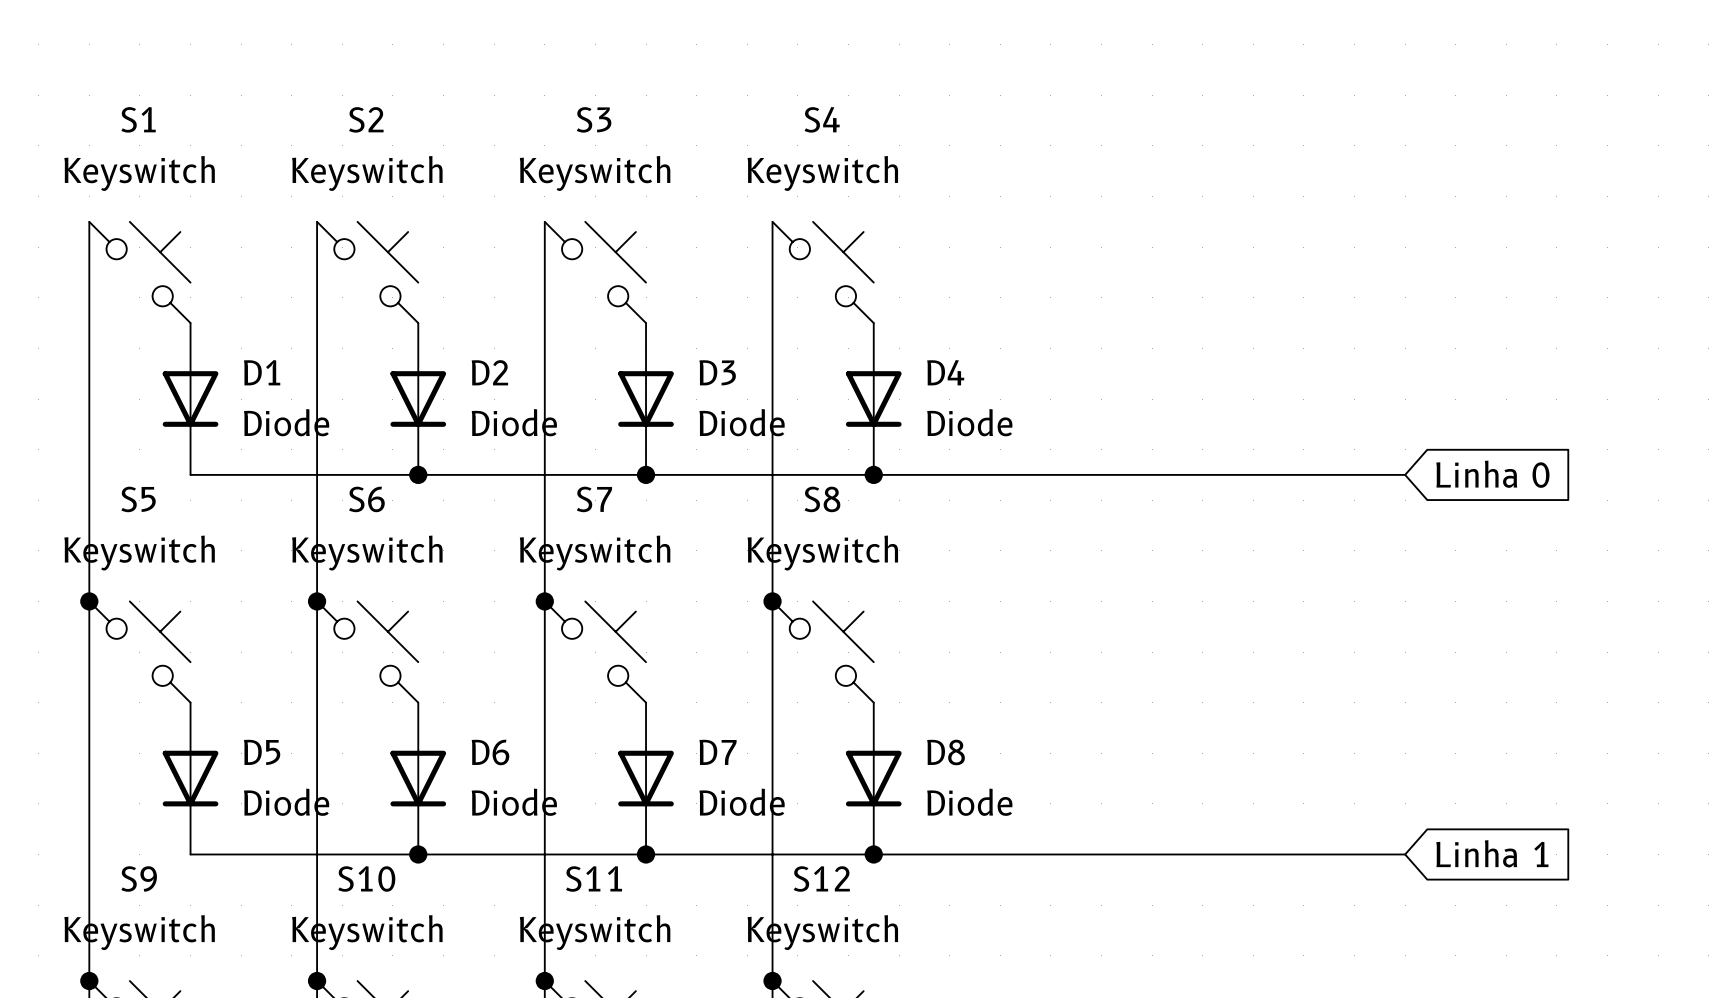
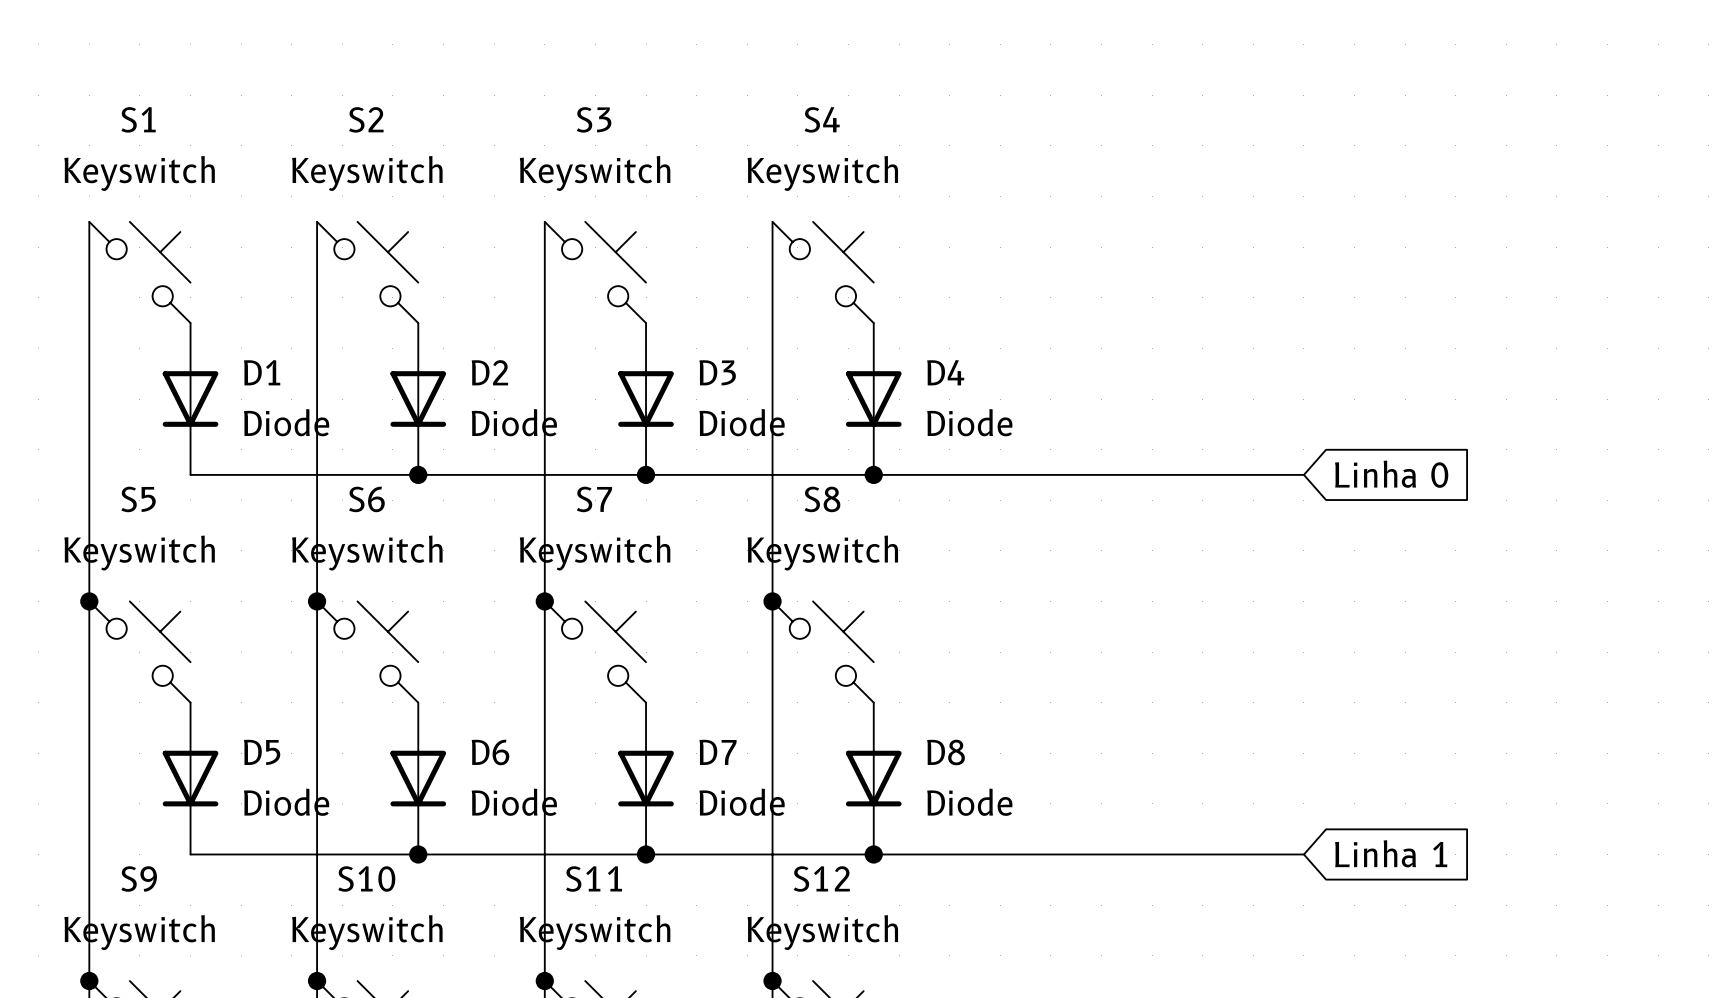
wire: (1303, 474) (1405, 474) -> none
global label position: Linha 0 (1492, 474) -> Linha 0 (1391, 474)
global label position: Linha 1 (1492, 853) -> Linha 1 (1391, 853)
wire: (1303, 854) (1405, 854) -> none

